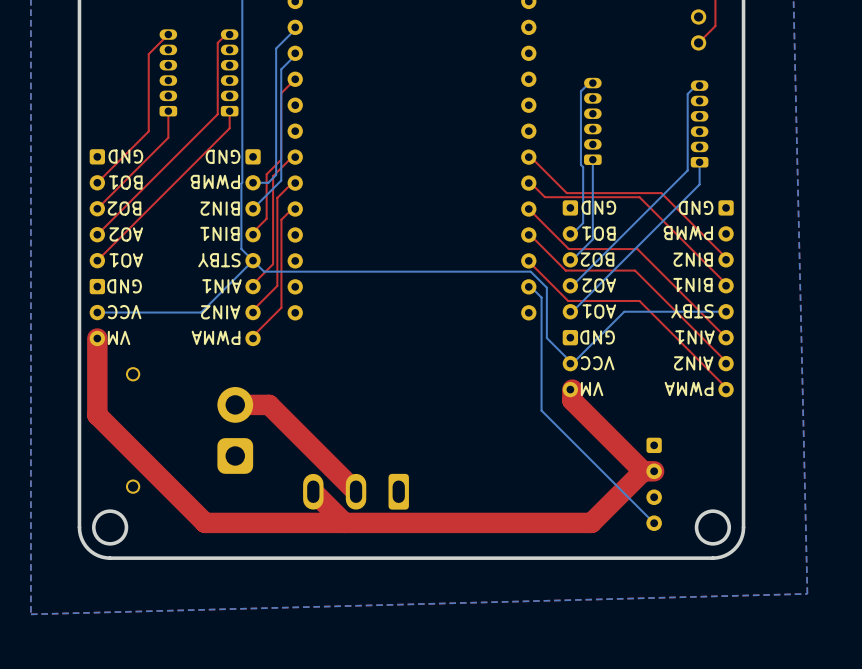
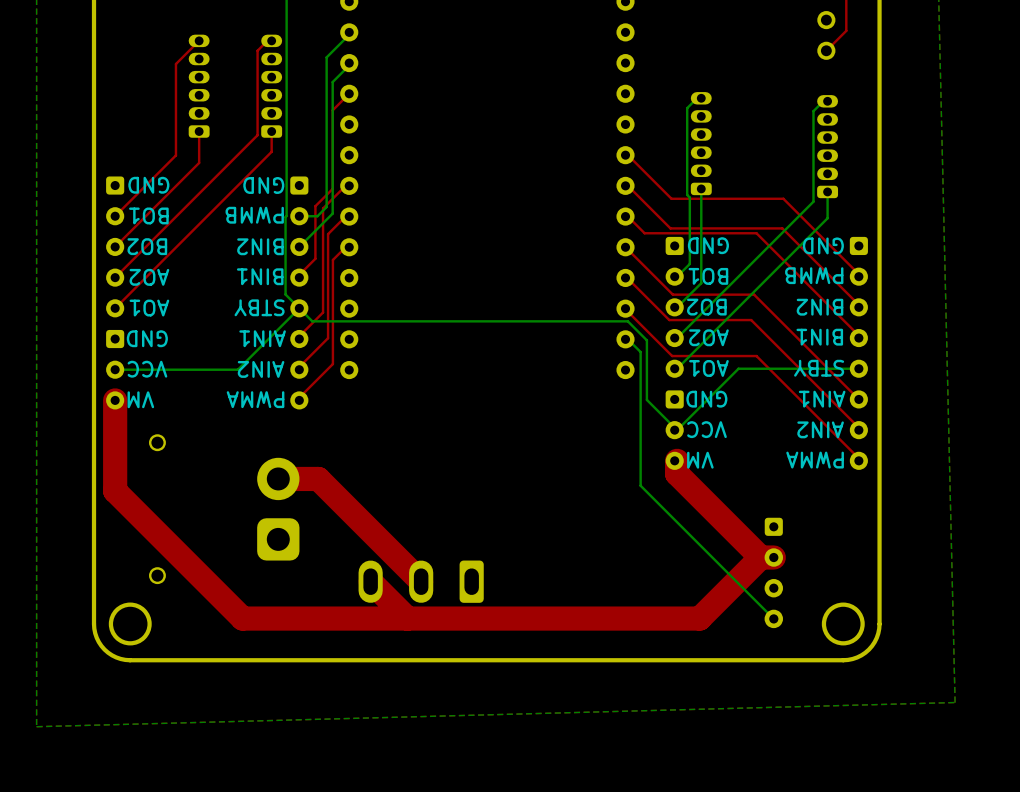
top track: none -> (627, 155) (671, 198) (783, 198) (861, 276)

